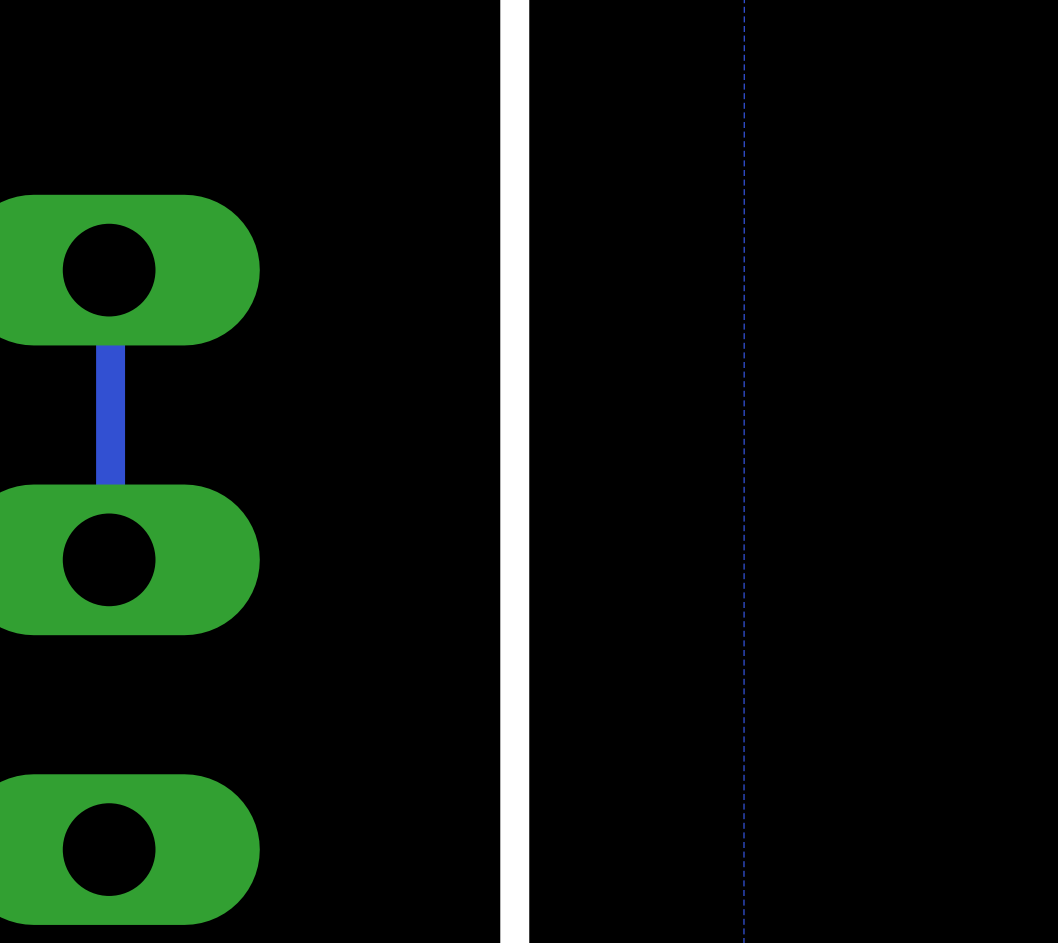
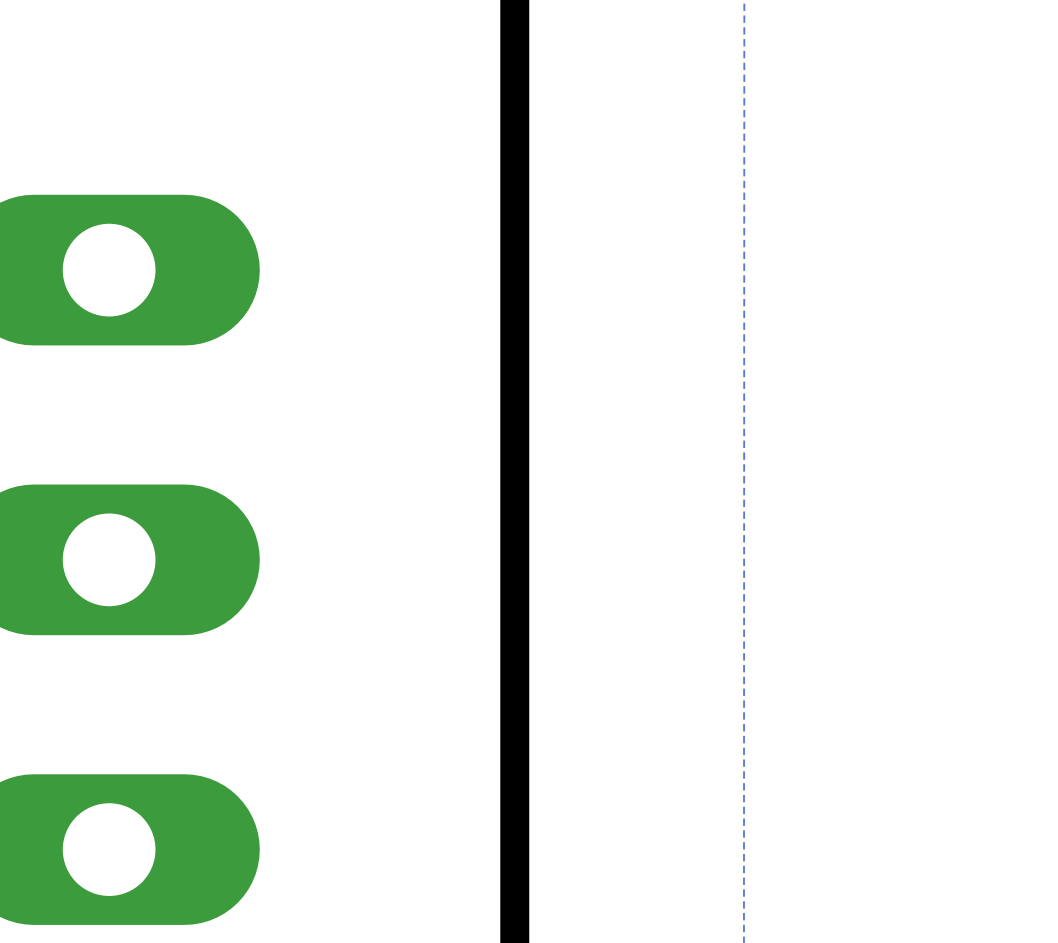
track: (109, 270) (109, 559) -> none

